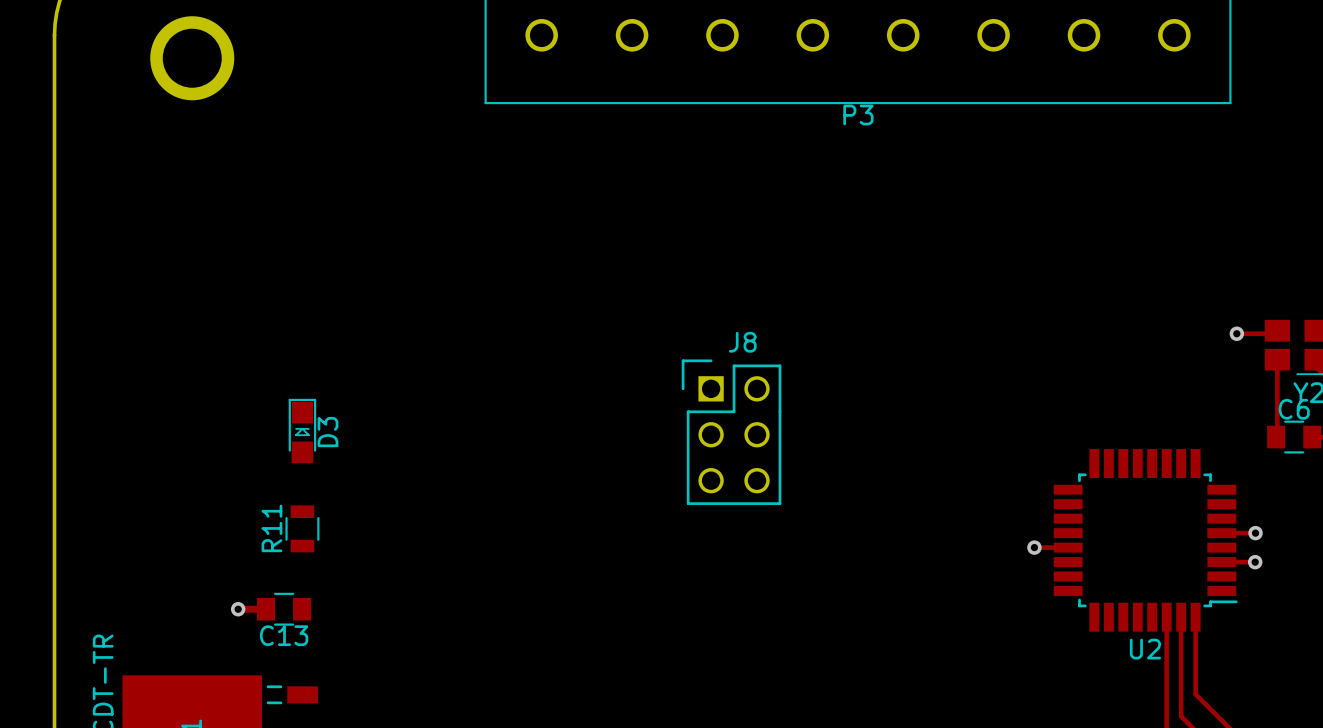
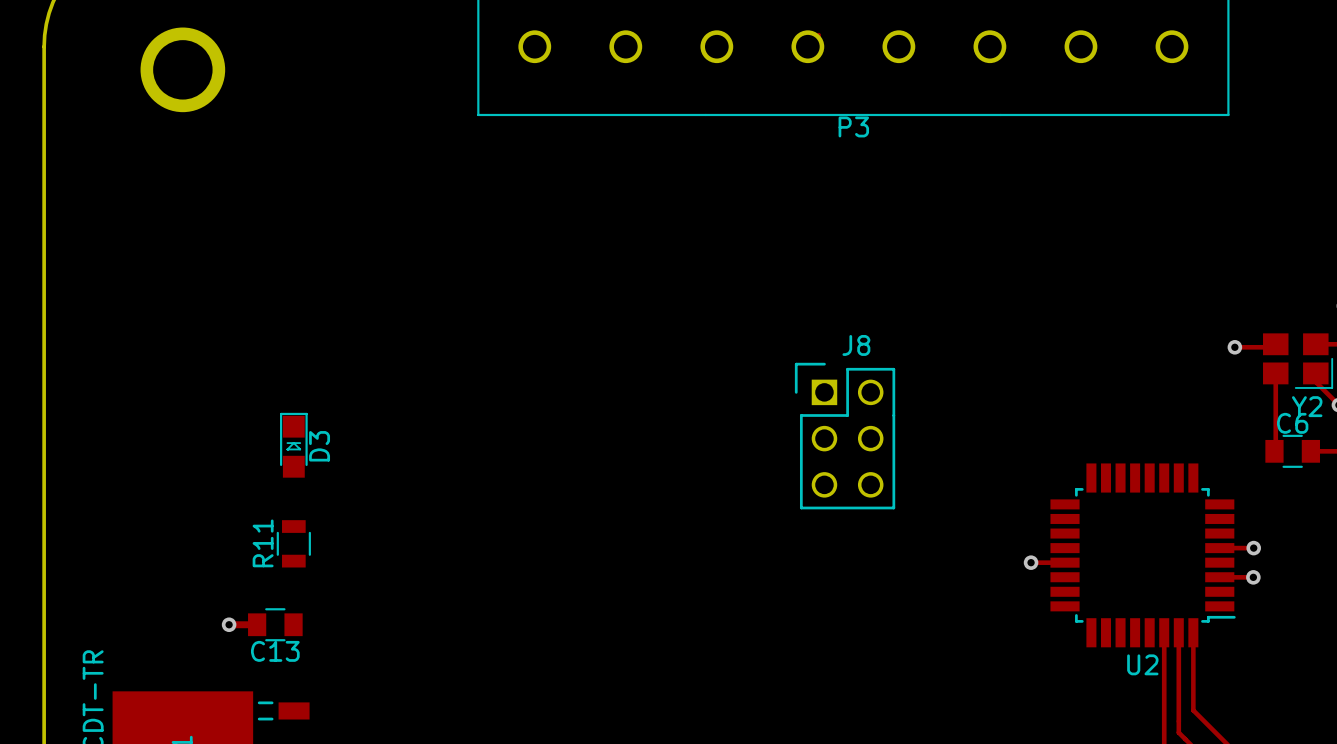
J8 position: (731, 432) -> (845, 436)

